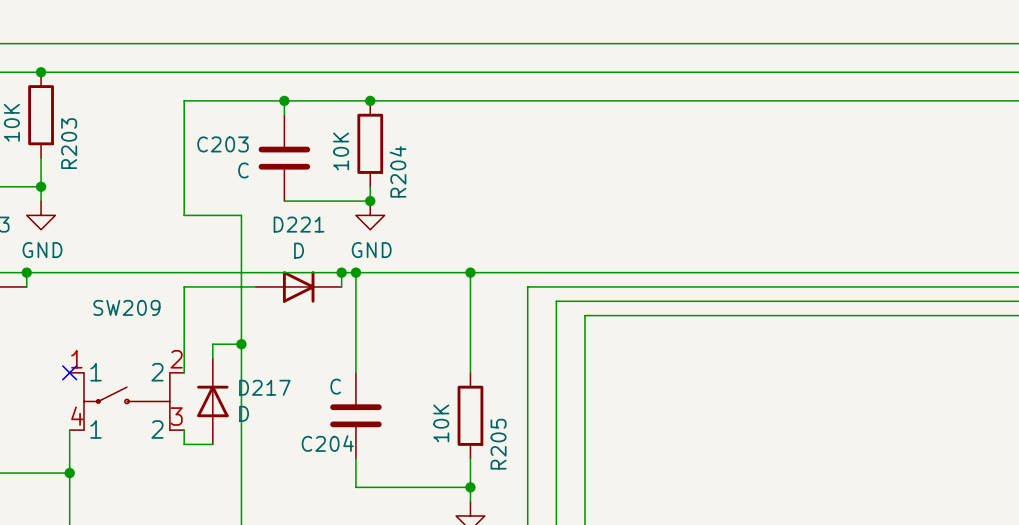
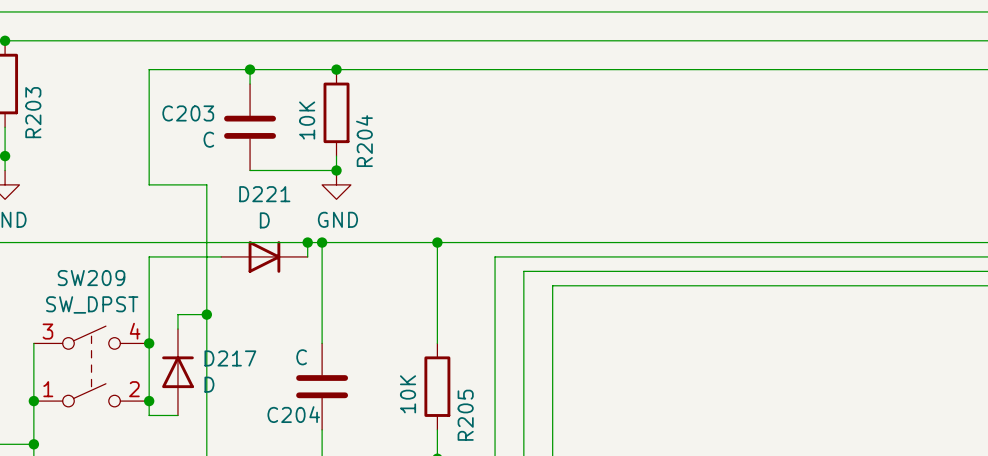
SW209 value: none -> SW_DPST (92, 304)
wire: none -> (33, 343) (33, 401)
no-connect mark: (69, 372) -> none
SW209 symbol: [69, 372, 185, 431] -> [33, 326, 150, 407]
wire: none -> (149, 343) (149, 401)
junction: none -> (149, 343)
junction: none -> (33, 401)
junction: none -> (149, 401)

